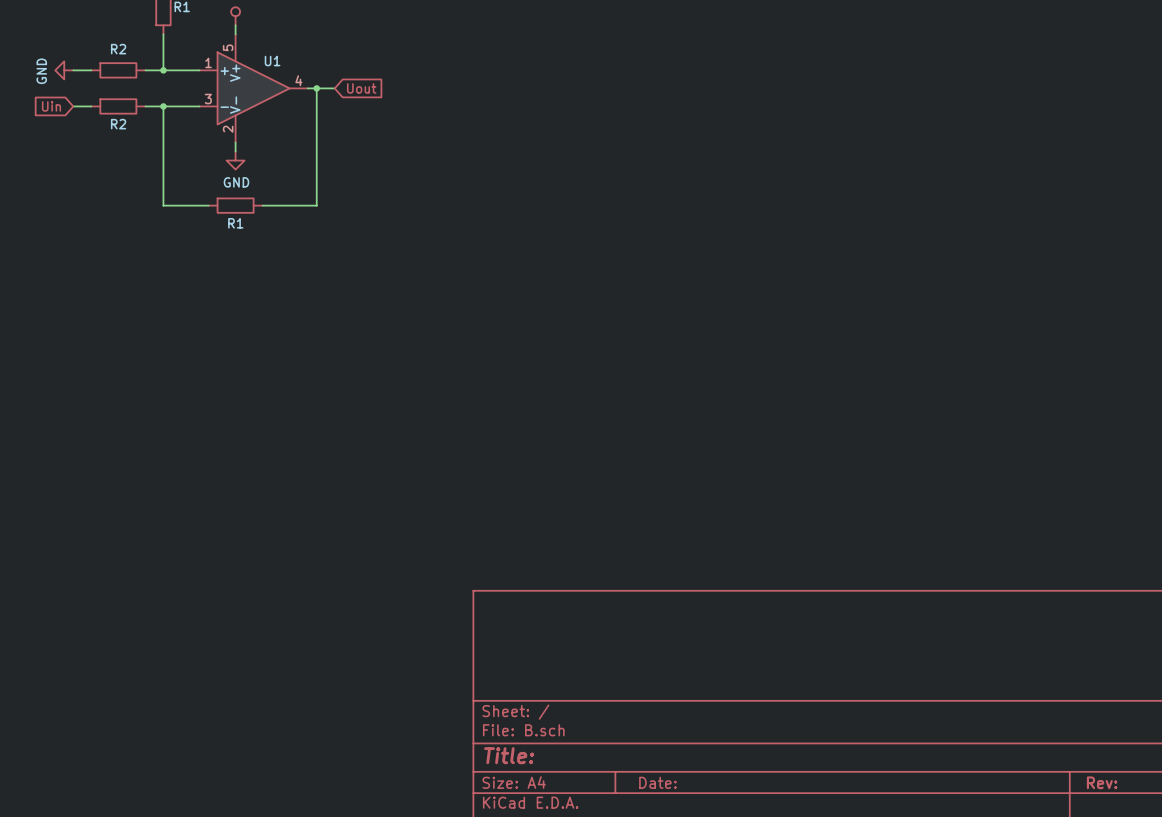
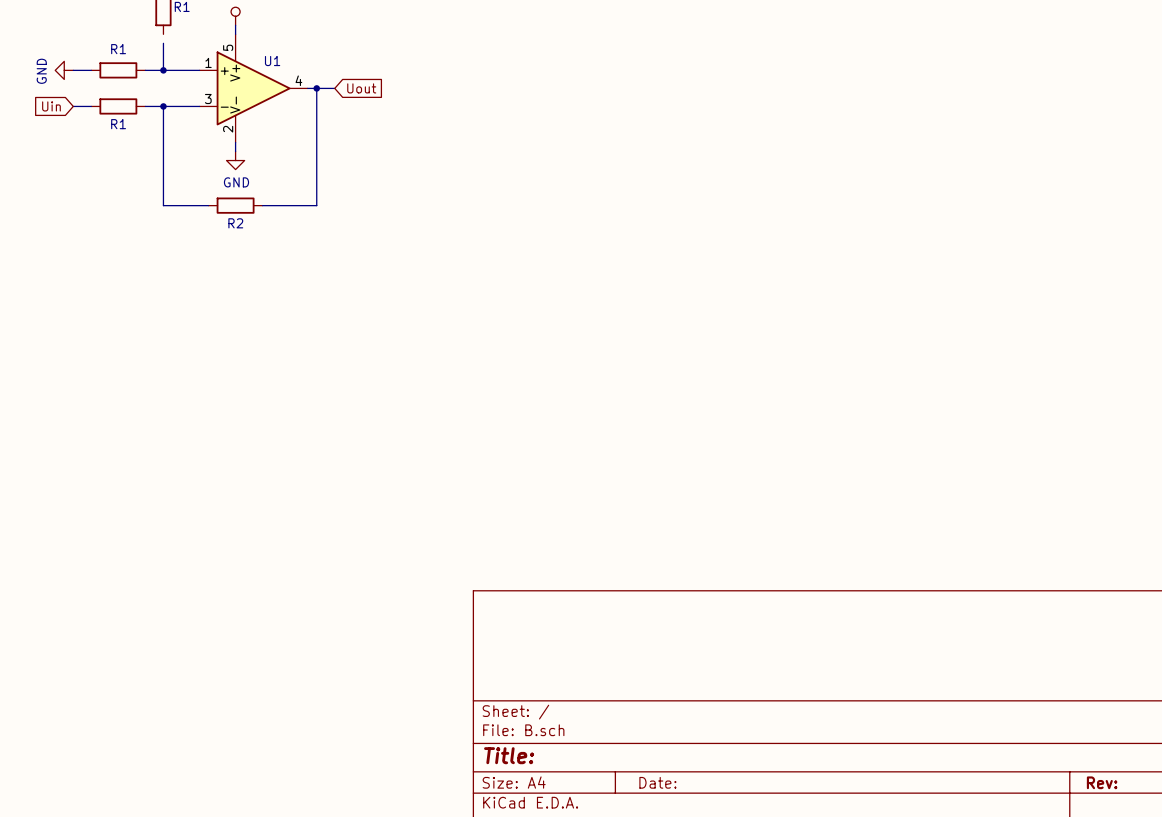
wire: (163, 34) (163, 43) -> none
part value: R2 (118, 49) -> R1 (118, 49)
part value: R2 (118, 124) -> R1 (118, 124)
part value: R1 (235, 223) -> R2 (235, 223)

